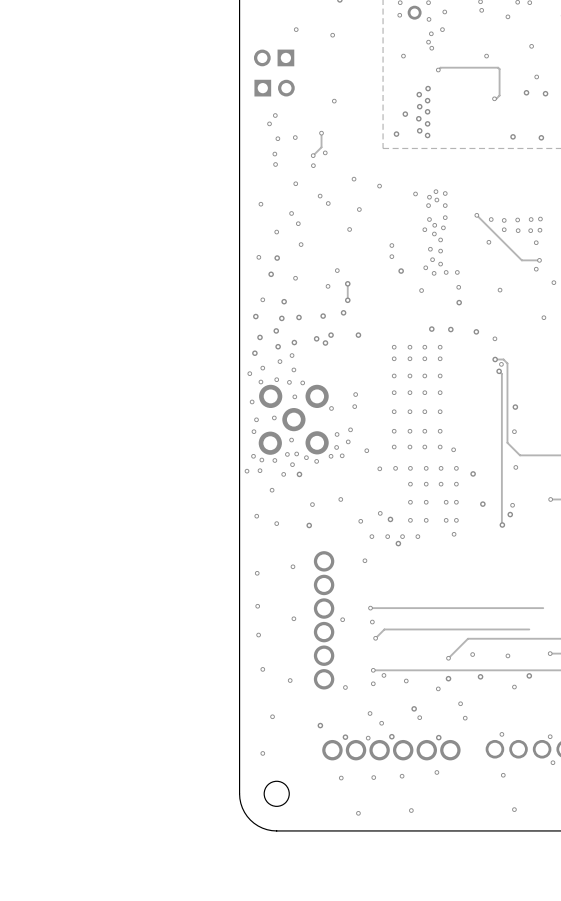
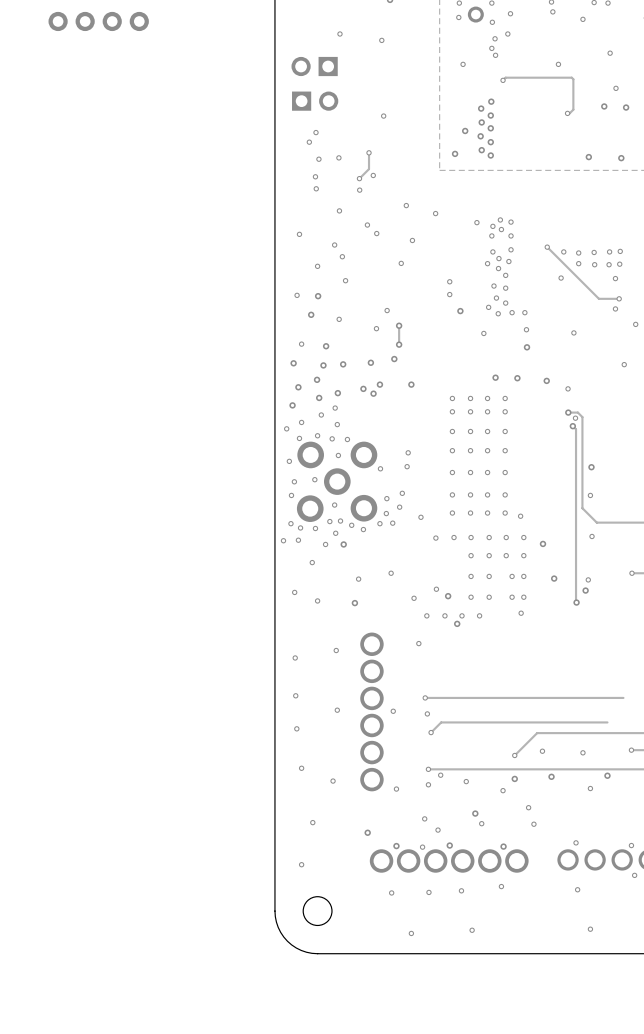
part: none -> (98, 21)

